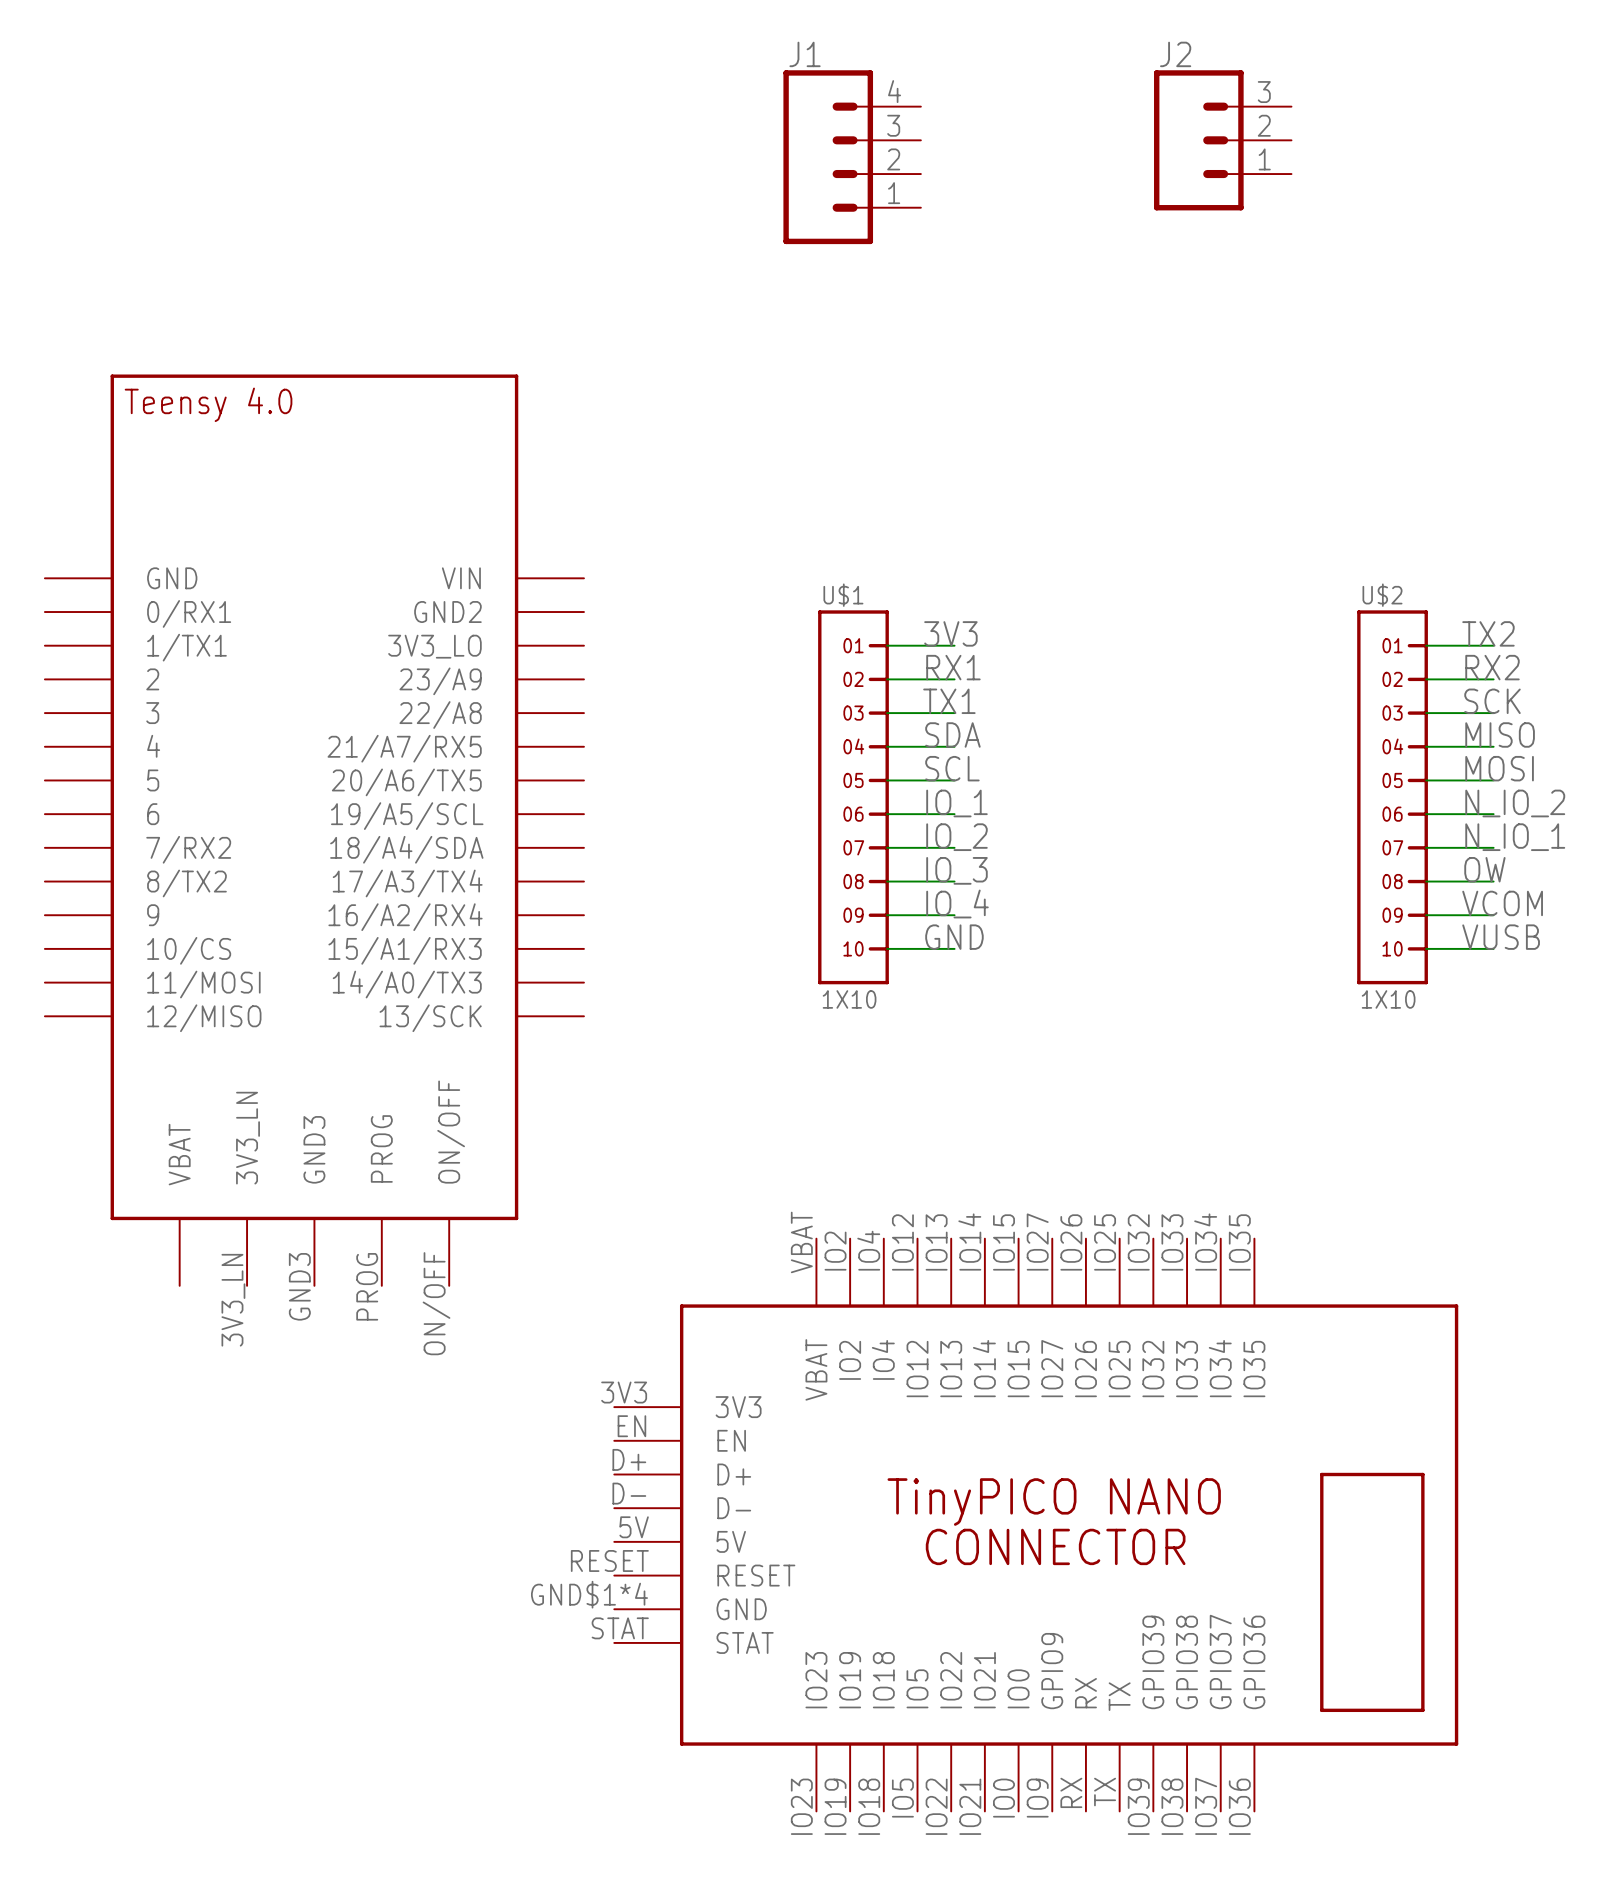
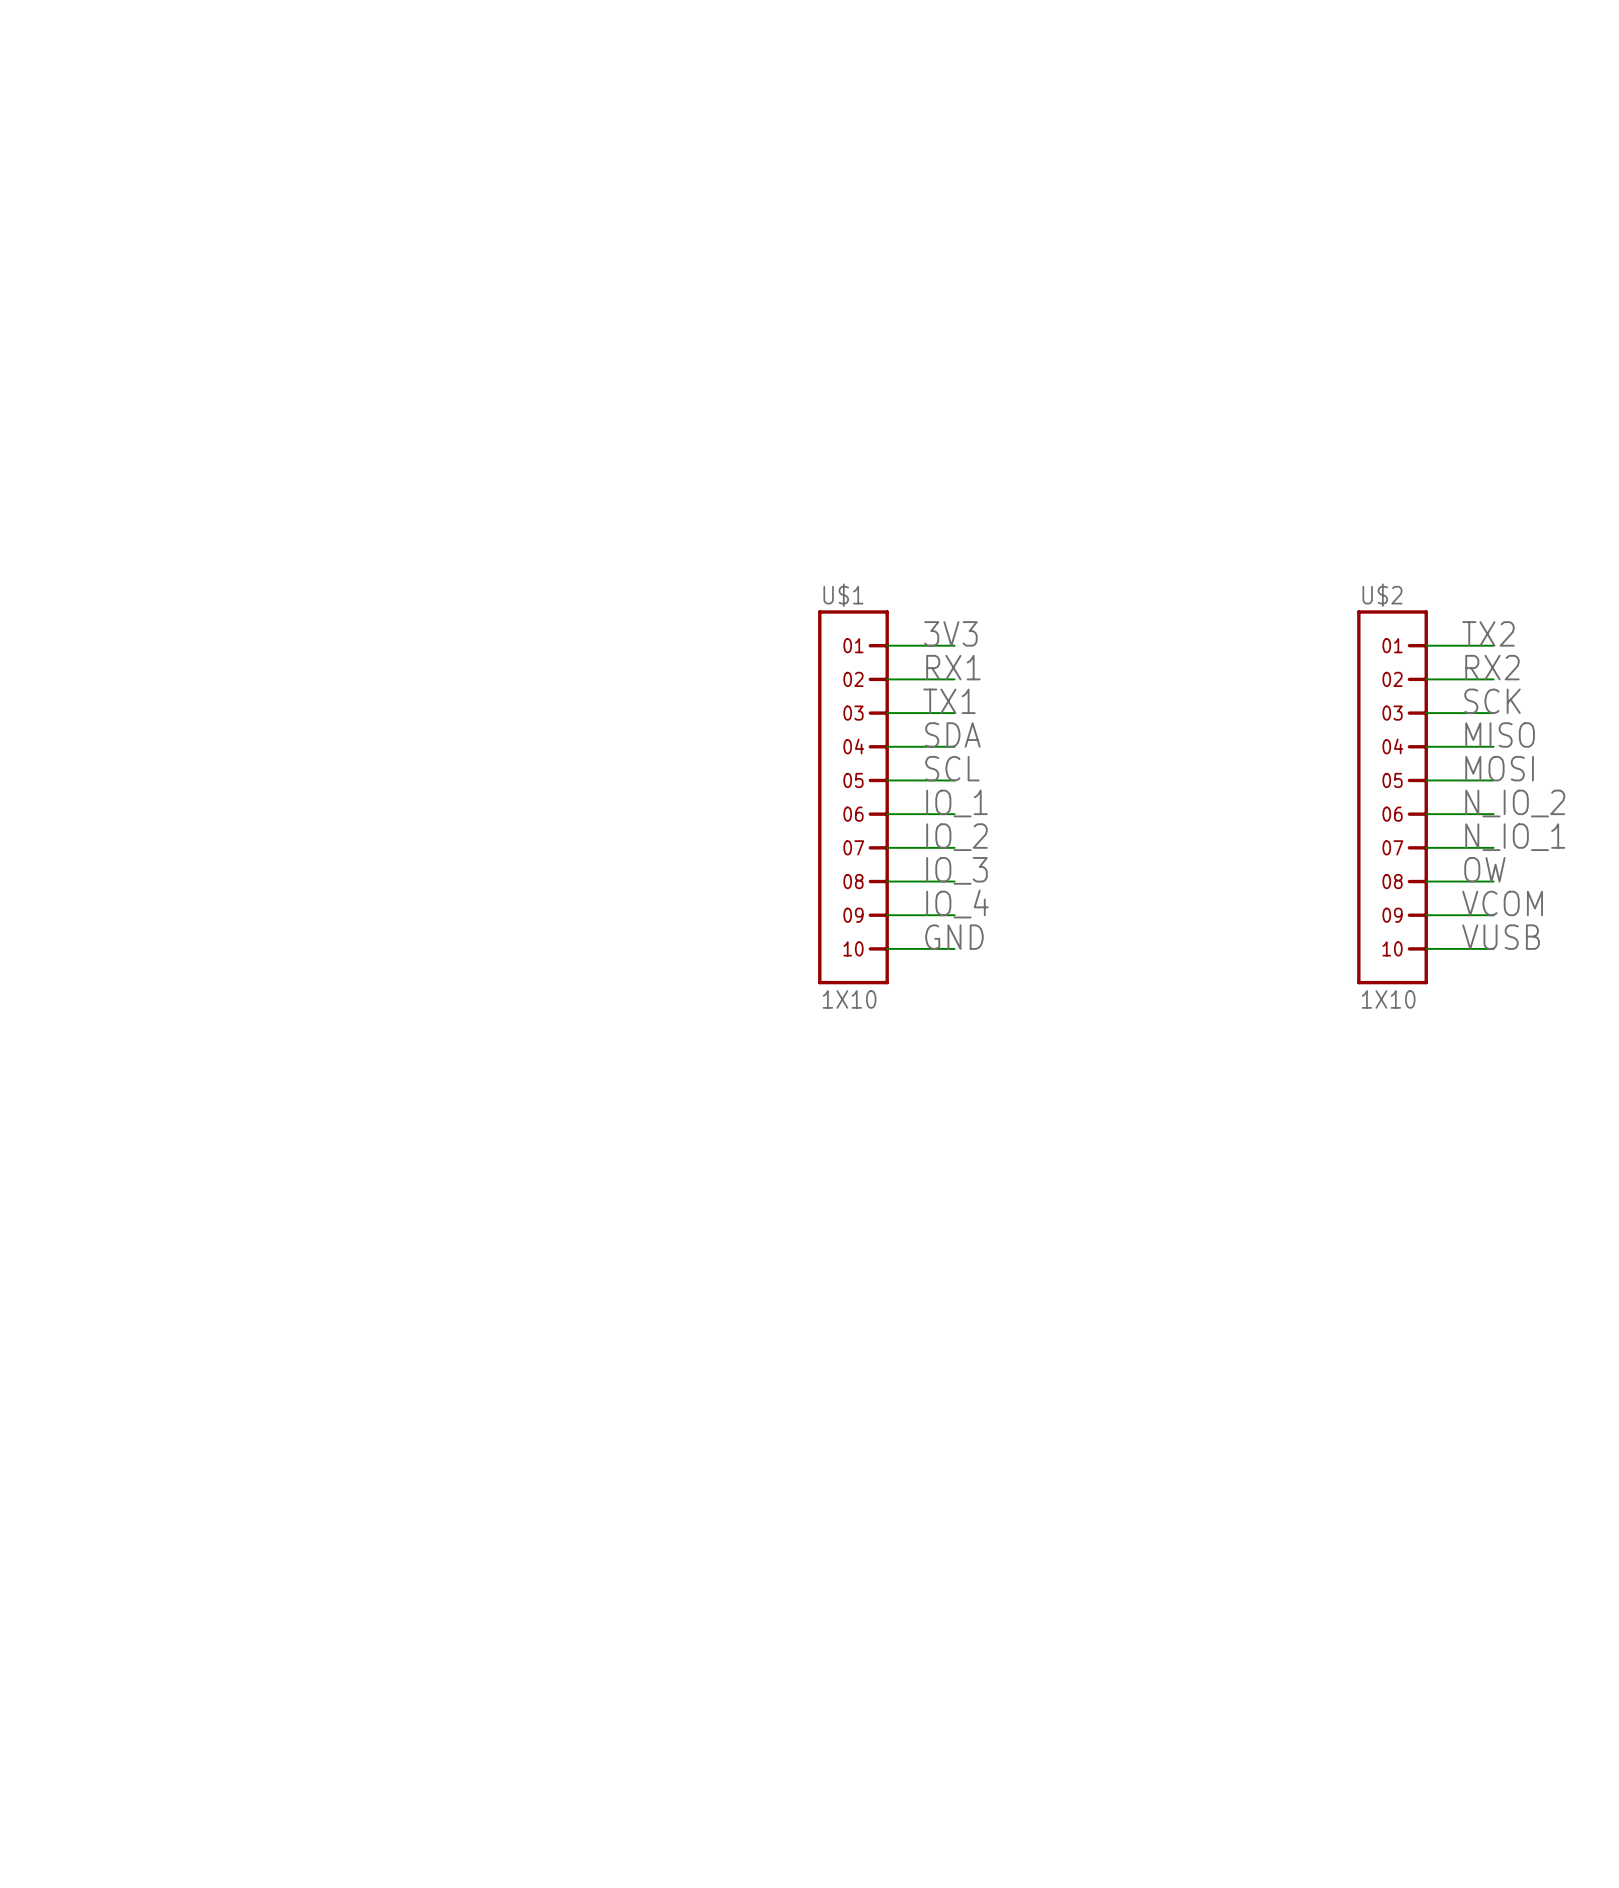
J2: (1222, 140) -> none
J1: (852, 157) -> none
part: (314, 830) -> none
part: (1036, 1525) -> none

